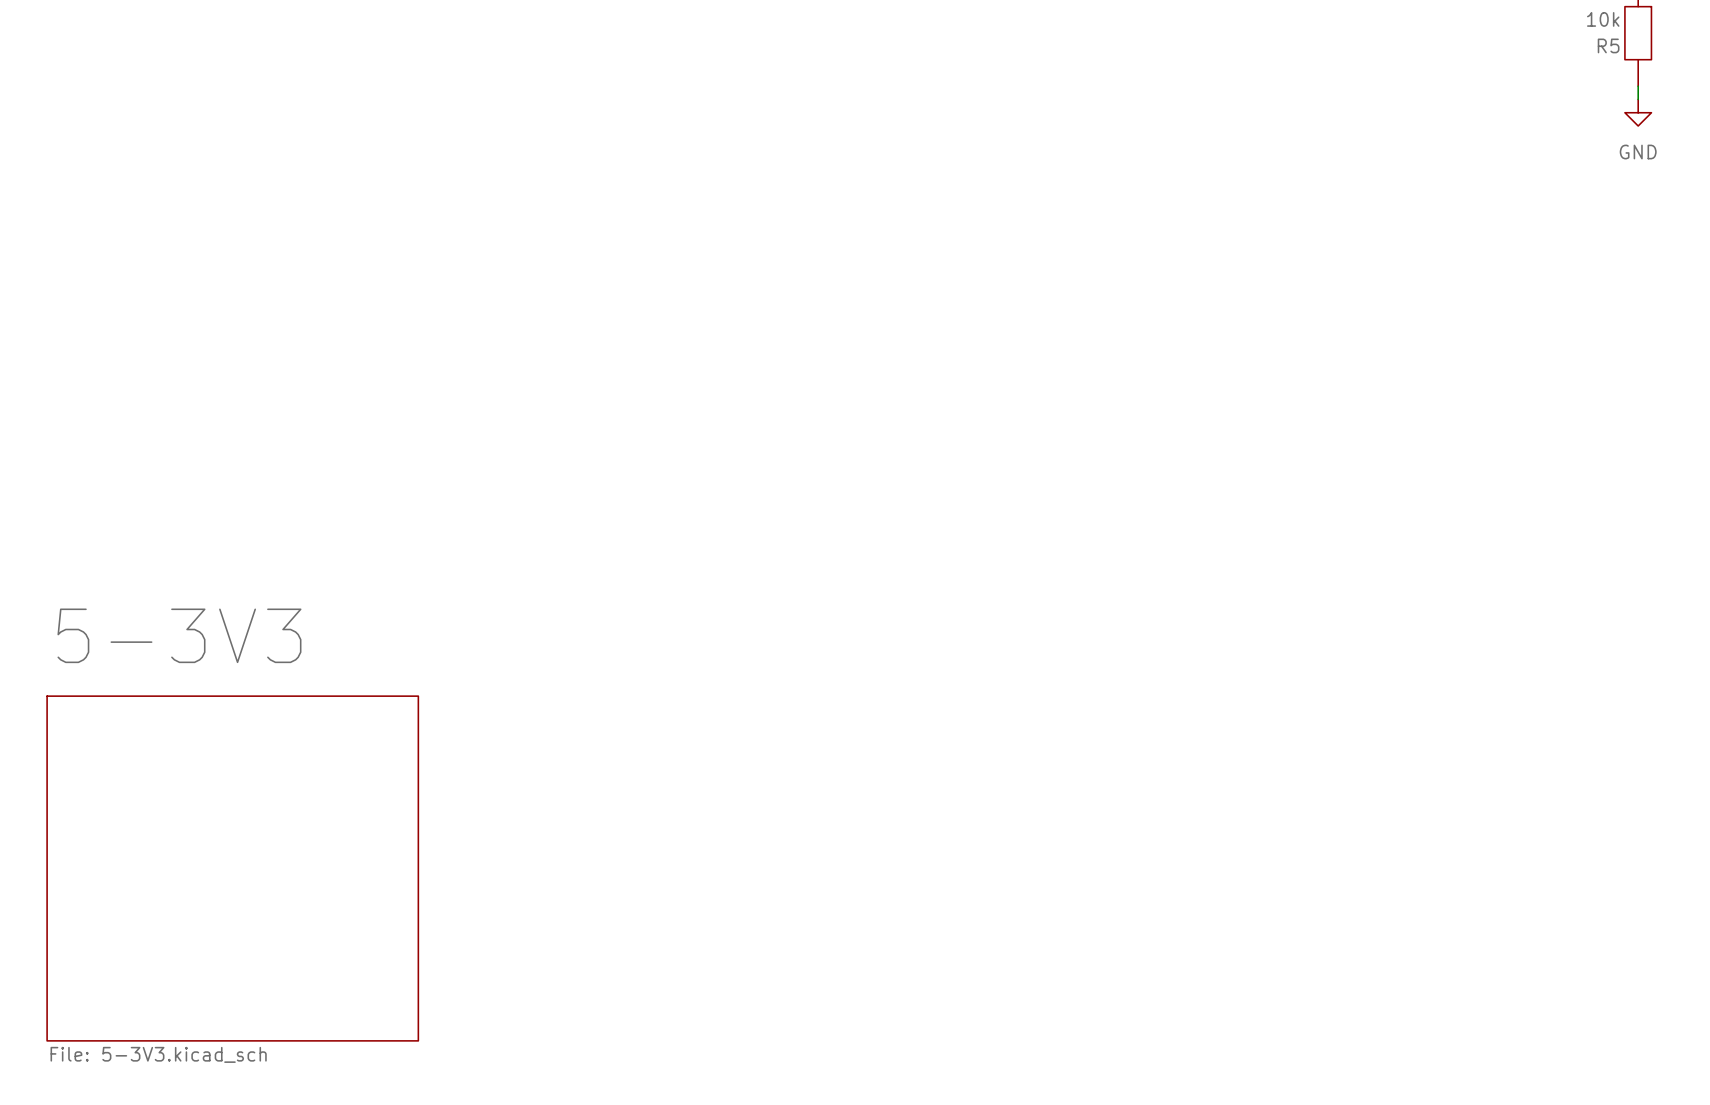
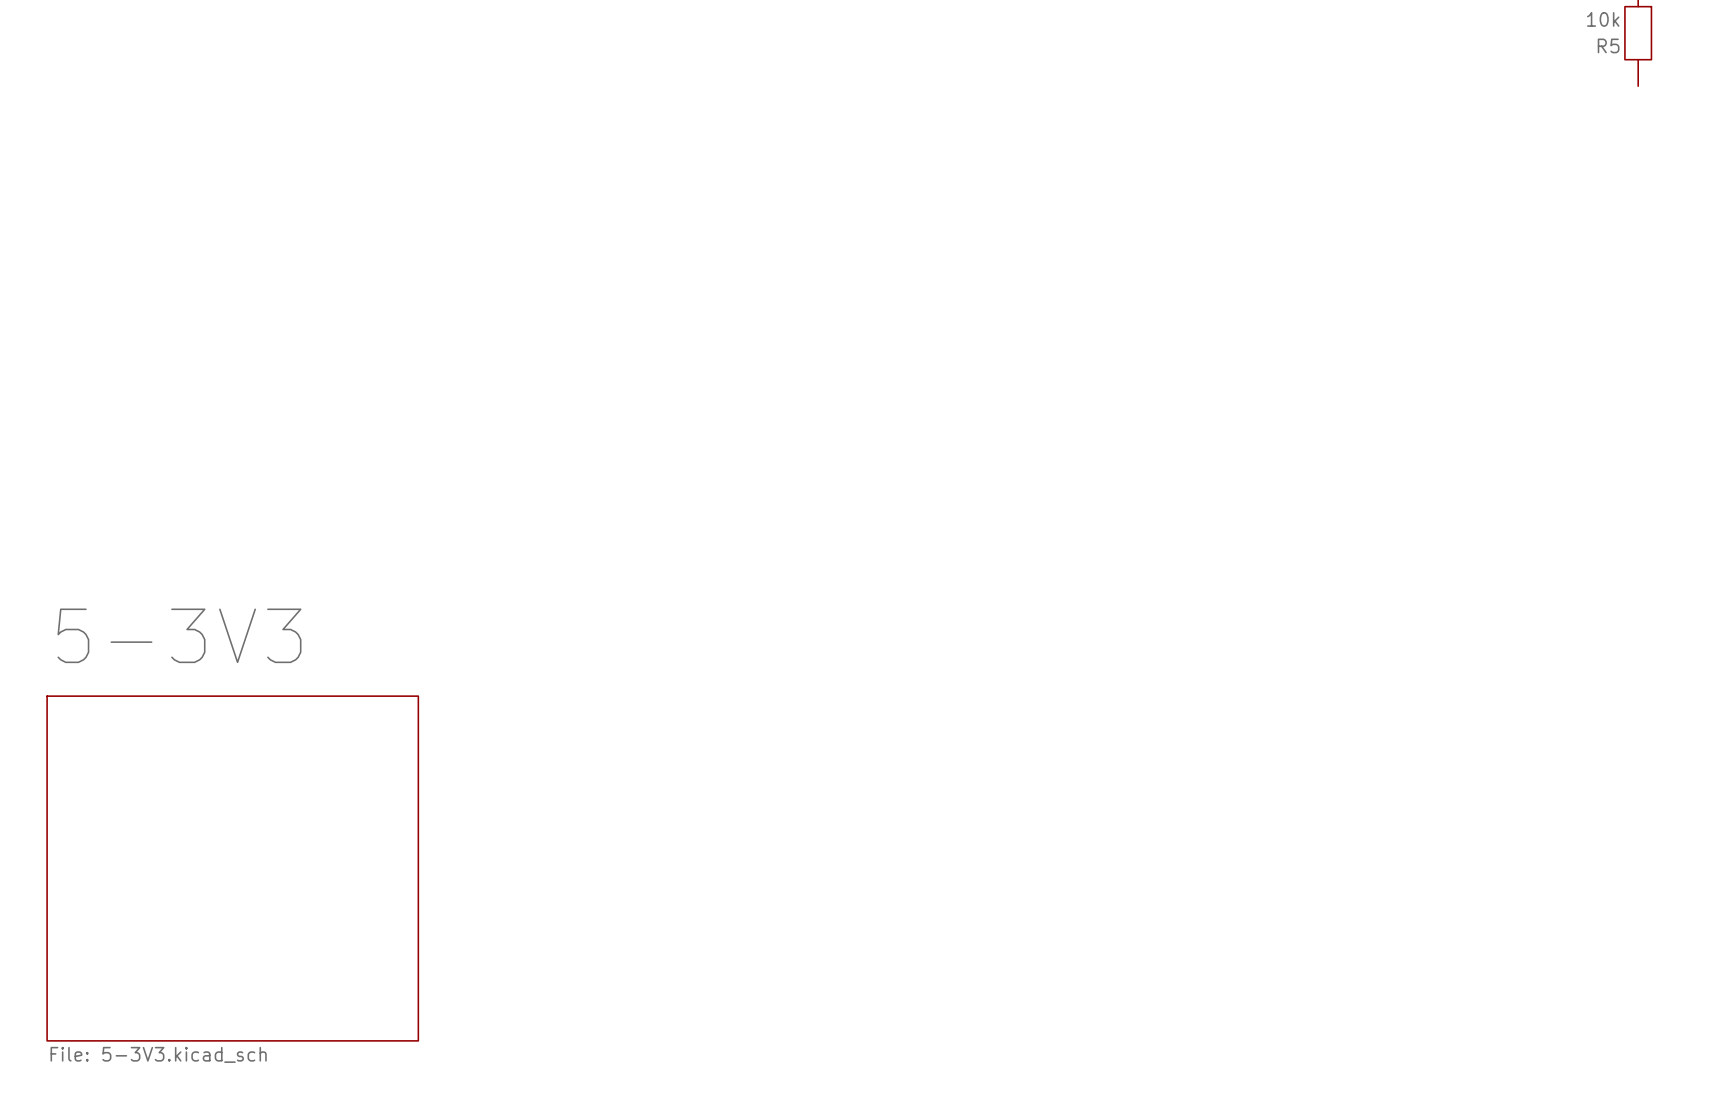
wire: (1638, 86) (1638, 99) -> none
power symbol: GND (1638, 112) -> none

